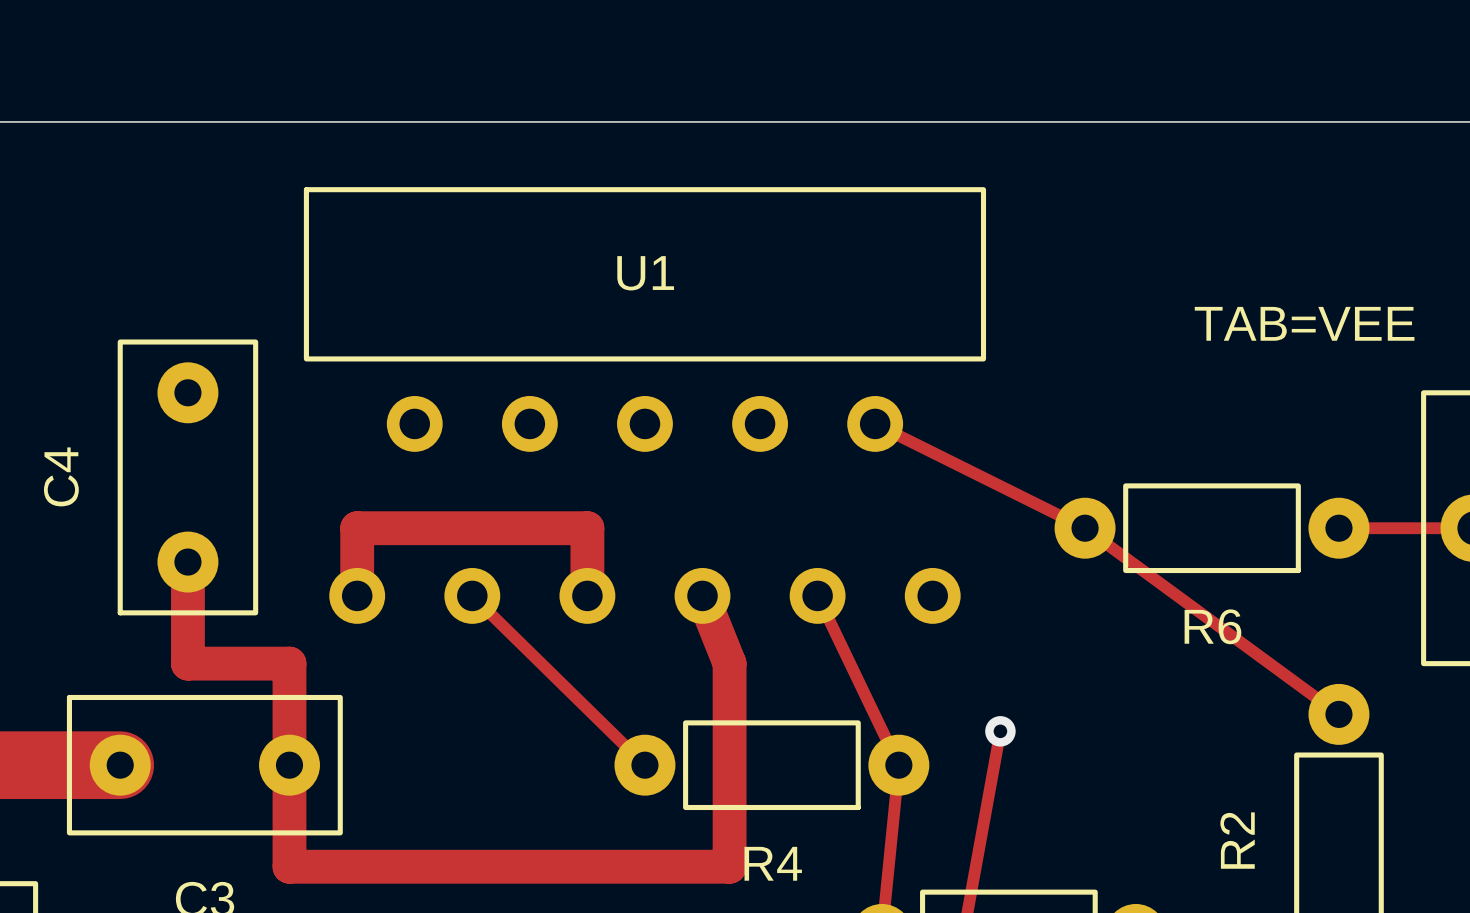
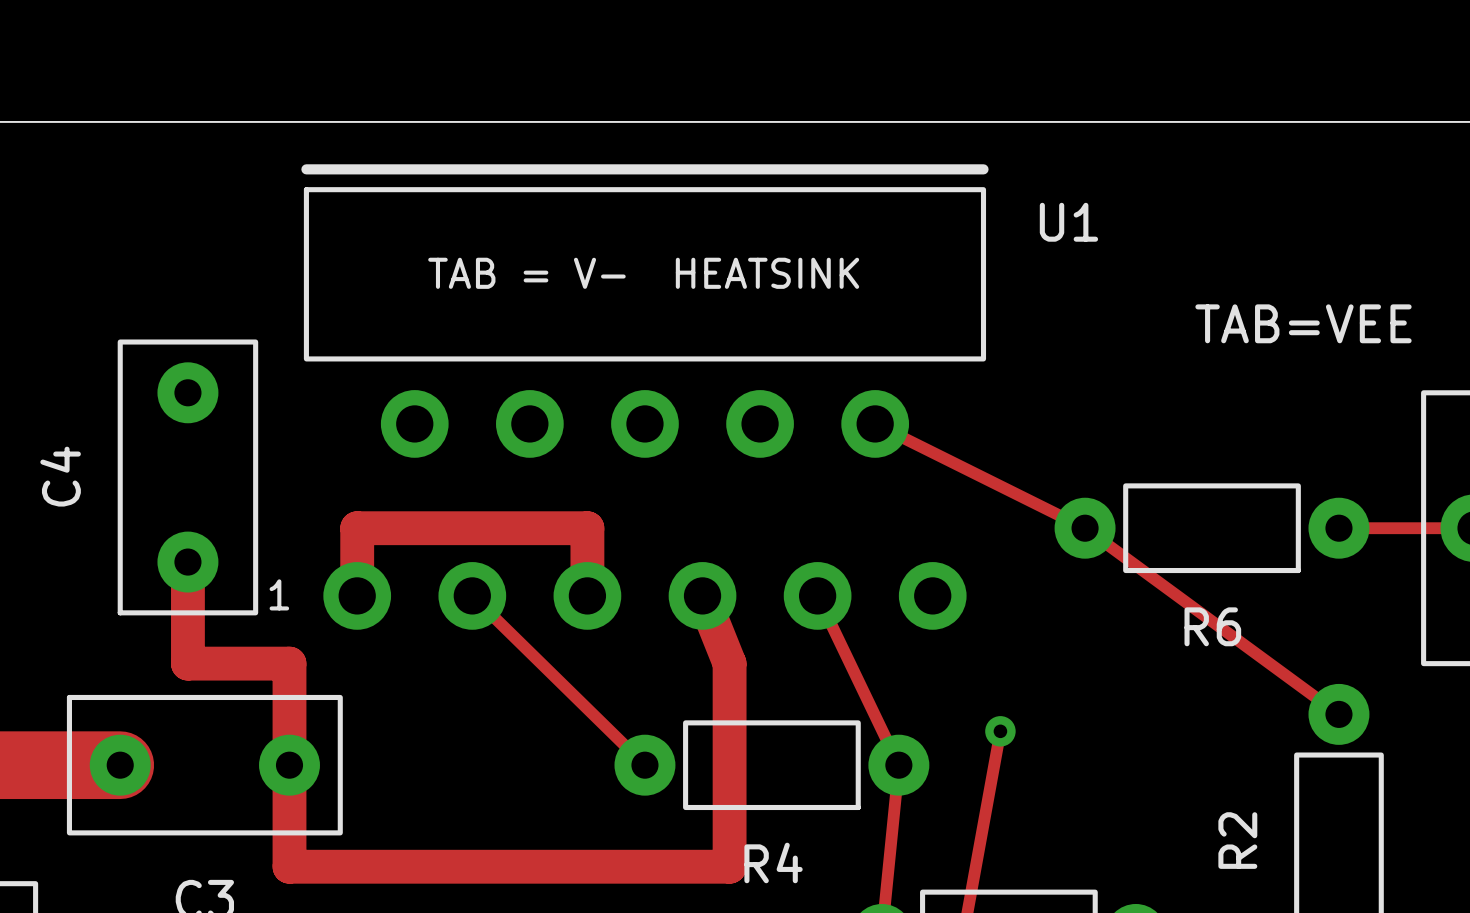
U1 footprint: [303, 187, 987, 624] -> [301, 164, 989, 630]
U1 name position: U1 (645, 273) -> U1 (1068, 222)

